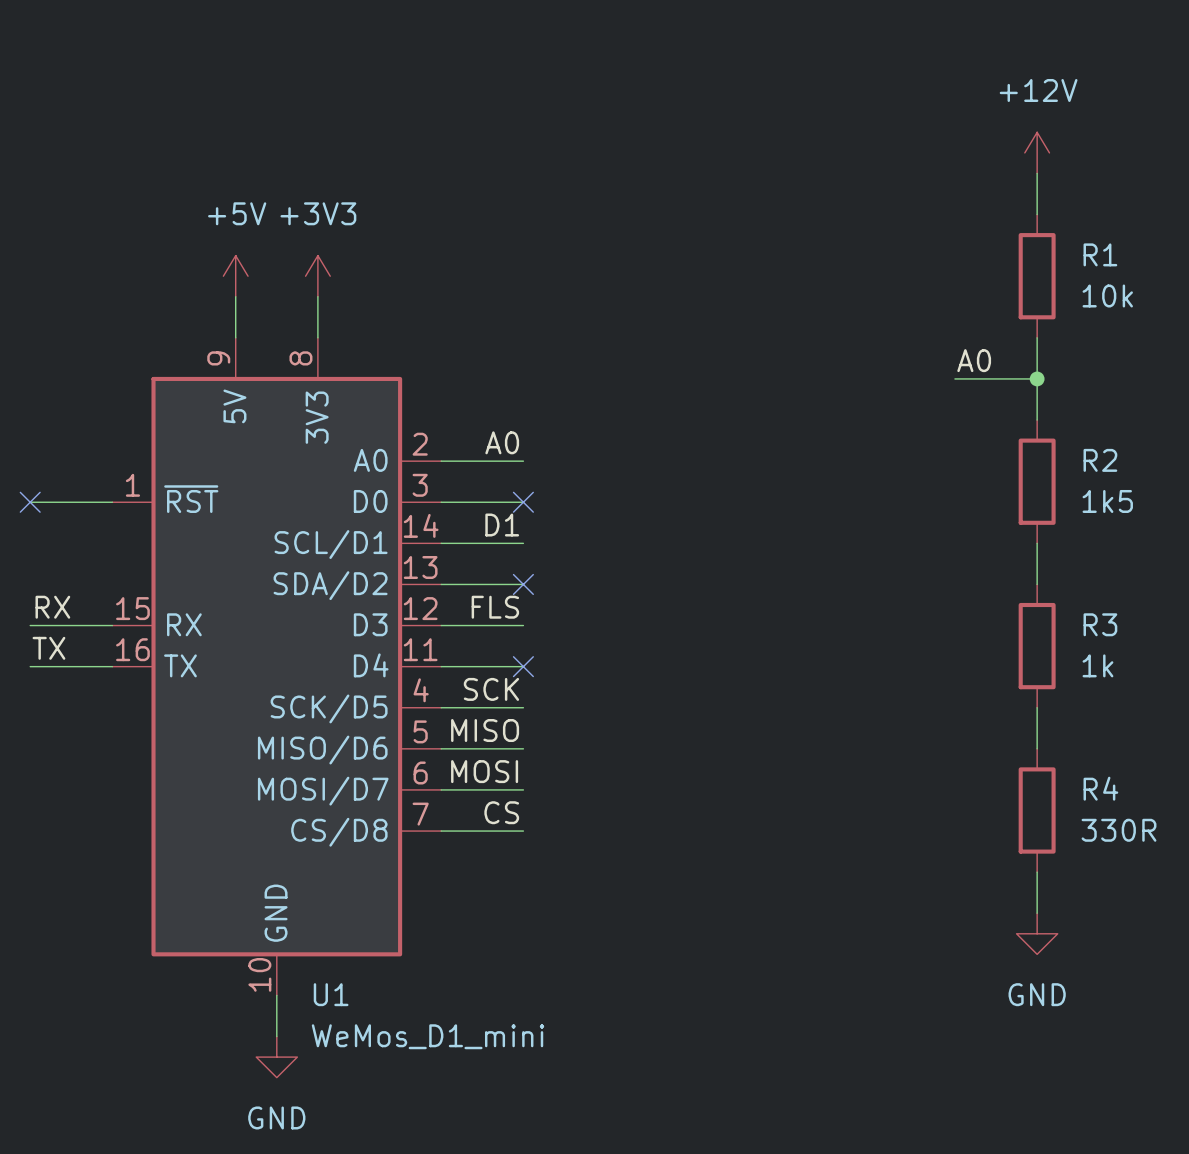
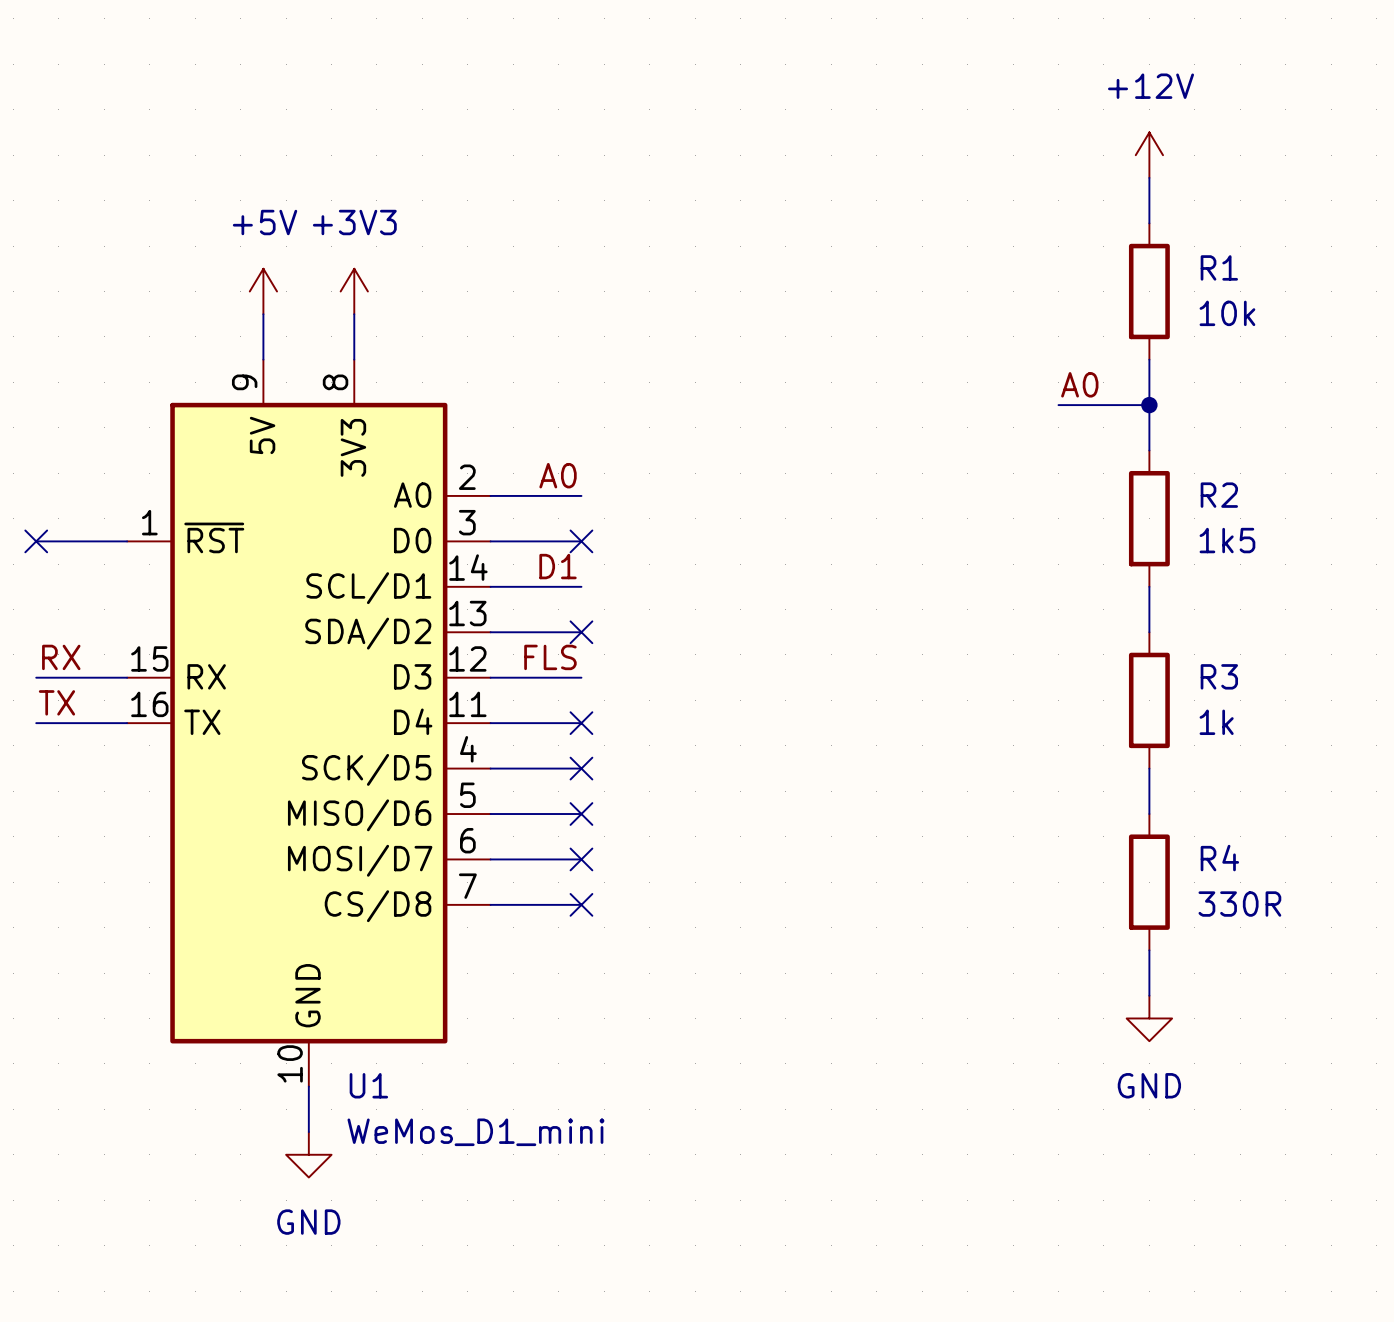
label: SCK (491, 689) -> none
no-connect mark: none -> (581, 768)
label: MISO (485, 730) -> none
no-connect mark: none -> (581, 814)
label: MOSI (484, 771) -> none
no-connect mark: none -> (581, 859)
label: CS (501, 812) -> none
no-connect mark: none -> (581, 904)

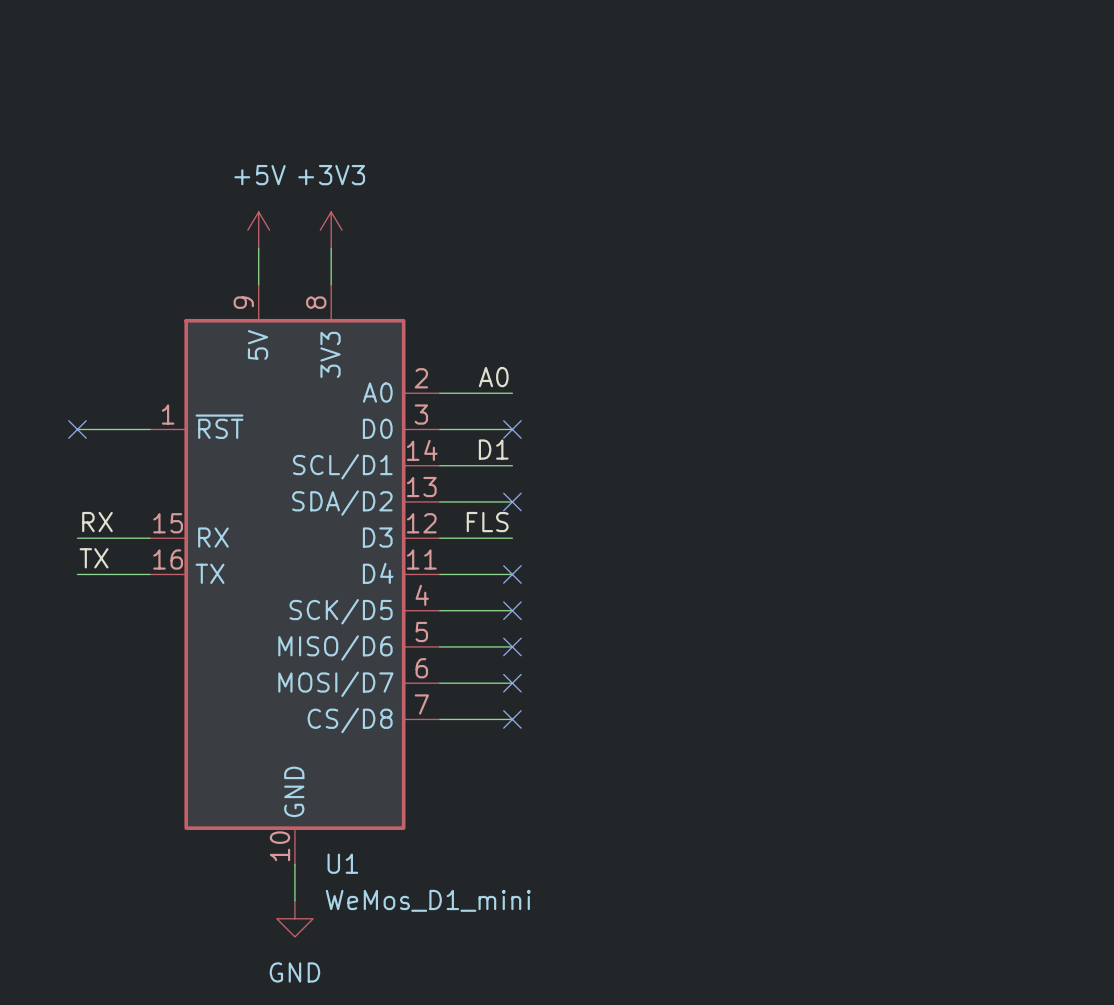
power symbol: +12V (1149, 155) -> none
wire: (1149, 177) (1149, 223) -> none
R1: 10k (1149, 291) -> none
wire: (1149, 359) (1149, 450) -> none
label: A0 (1079, 384) -> none
wire: (1058, 405) (1149, 405) -> none
junction: (1149, 405) -> none
R2: 1k5 (1149, 518) -> none
wire: (1149, 586) (1149, 632) -> none
R3: 1k (1149, 700) -> none
wire: (1149, 768) (1149, 814) -> none
R4: 330R (1149, 882) -> none
wire: (1149, 950) (1149, 995) -> none
power symbol: GND (1149, 1018) -> none

